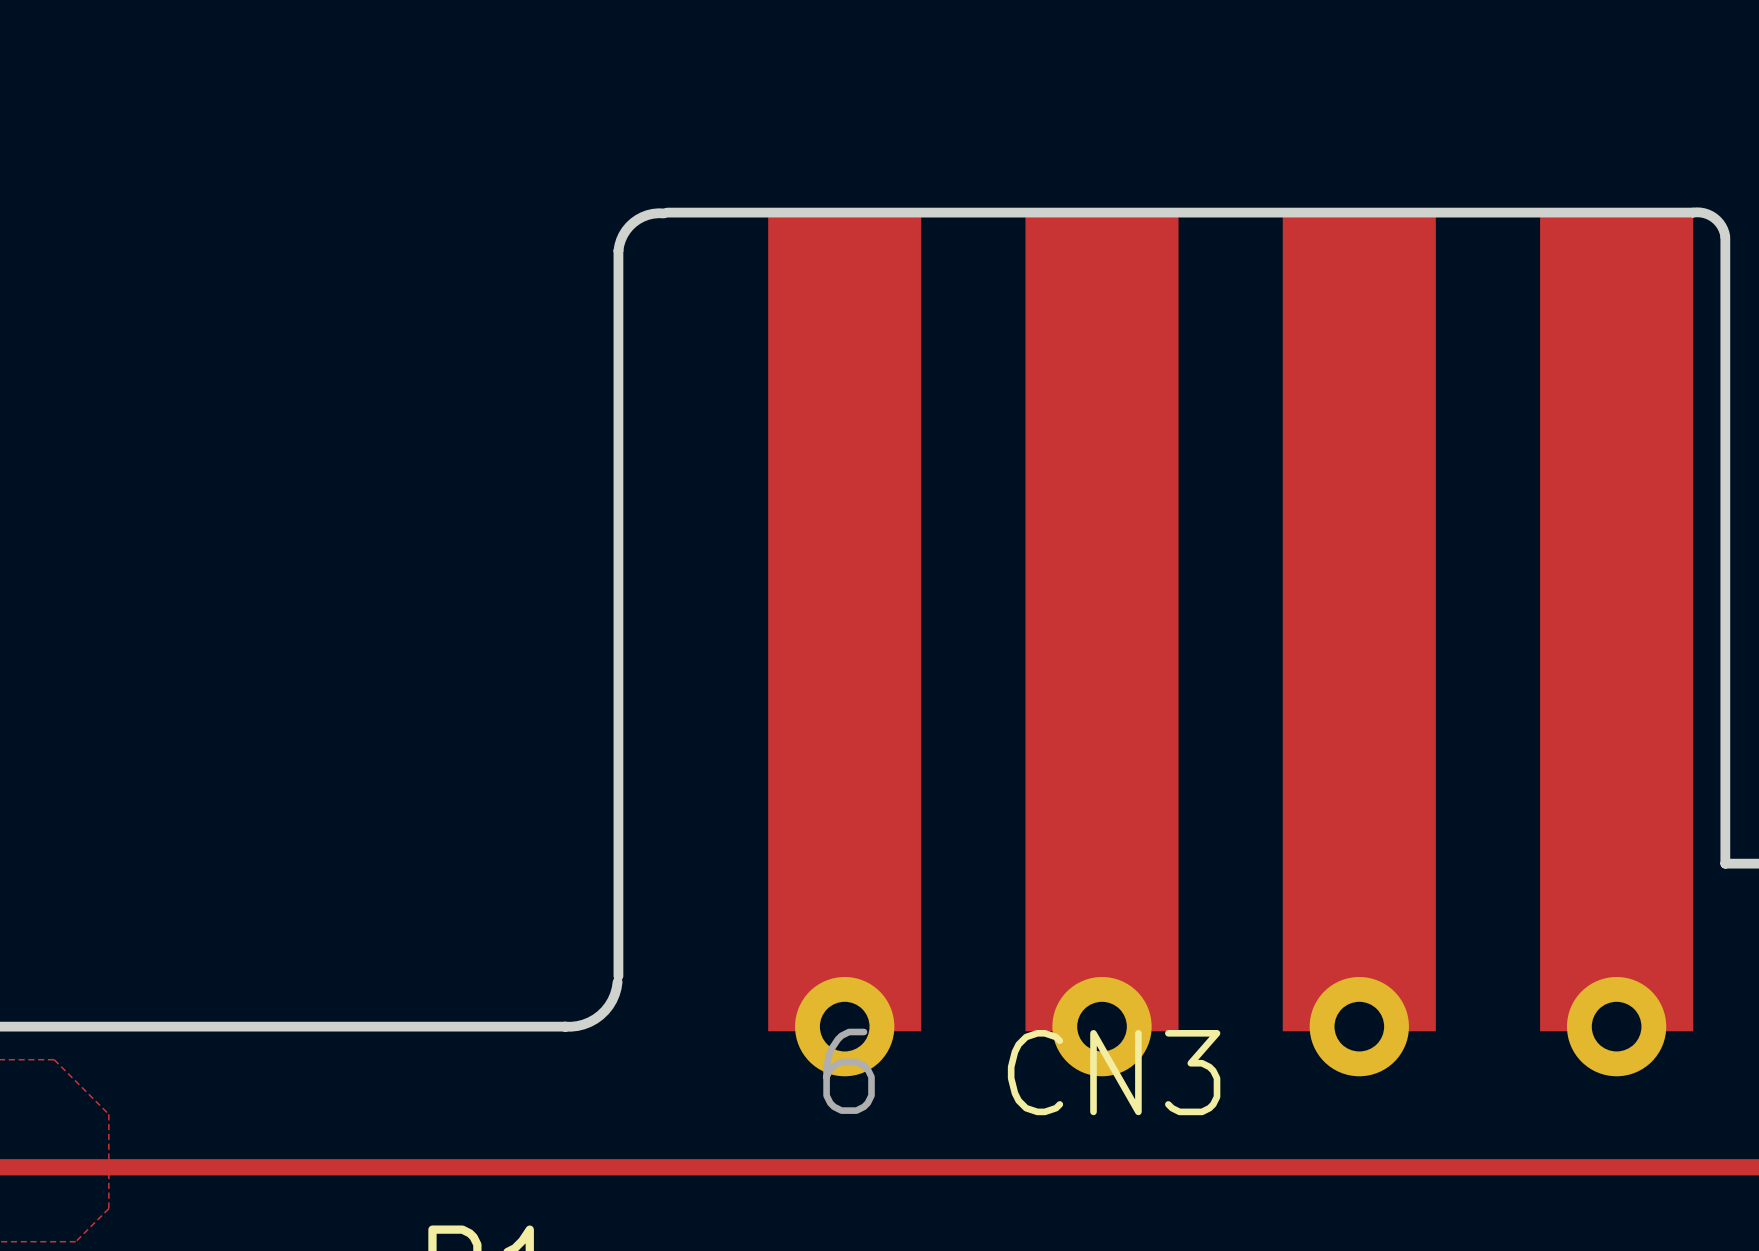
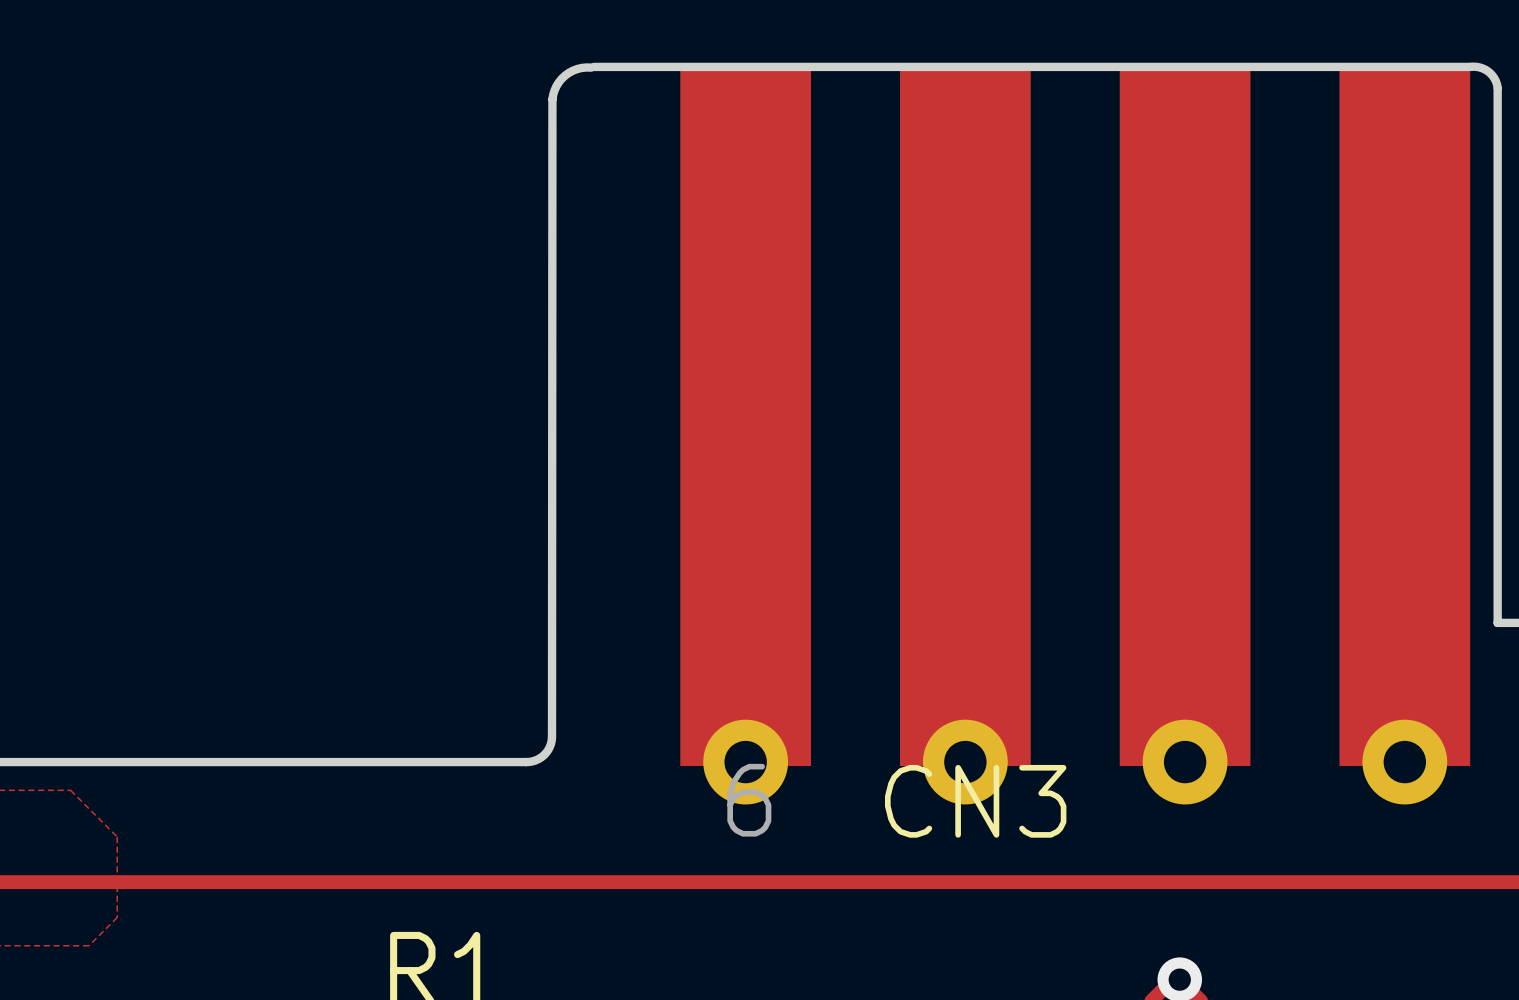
board edge: (618, 250) (618, 976) -> (552, 99) (552, 737) (548, 749) (538, 759) (529, 761) (507, 762)
board edge: (617, 981) (612, 1000) (600, 1015) (583, 1024) (564, 1026) -> none

